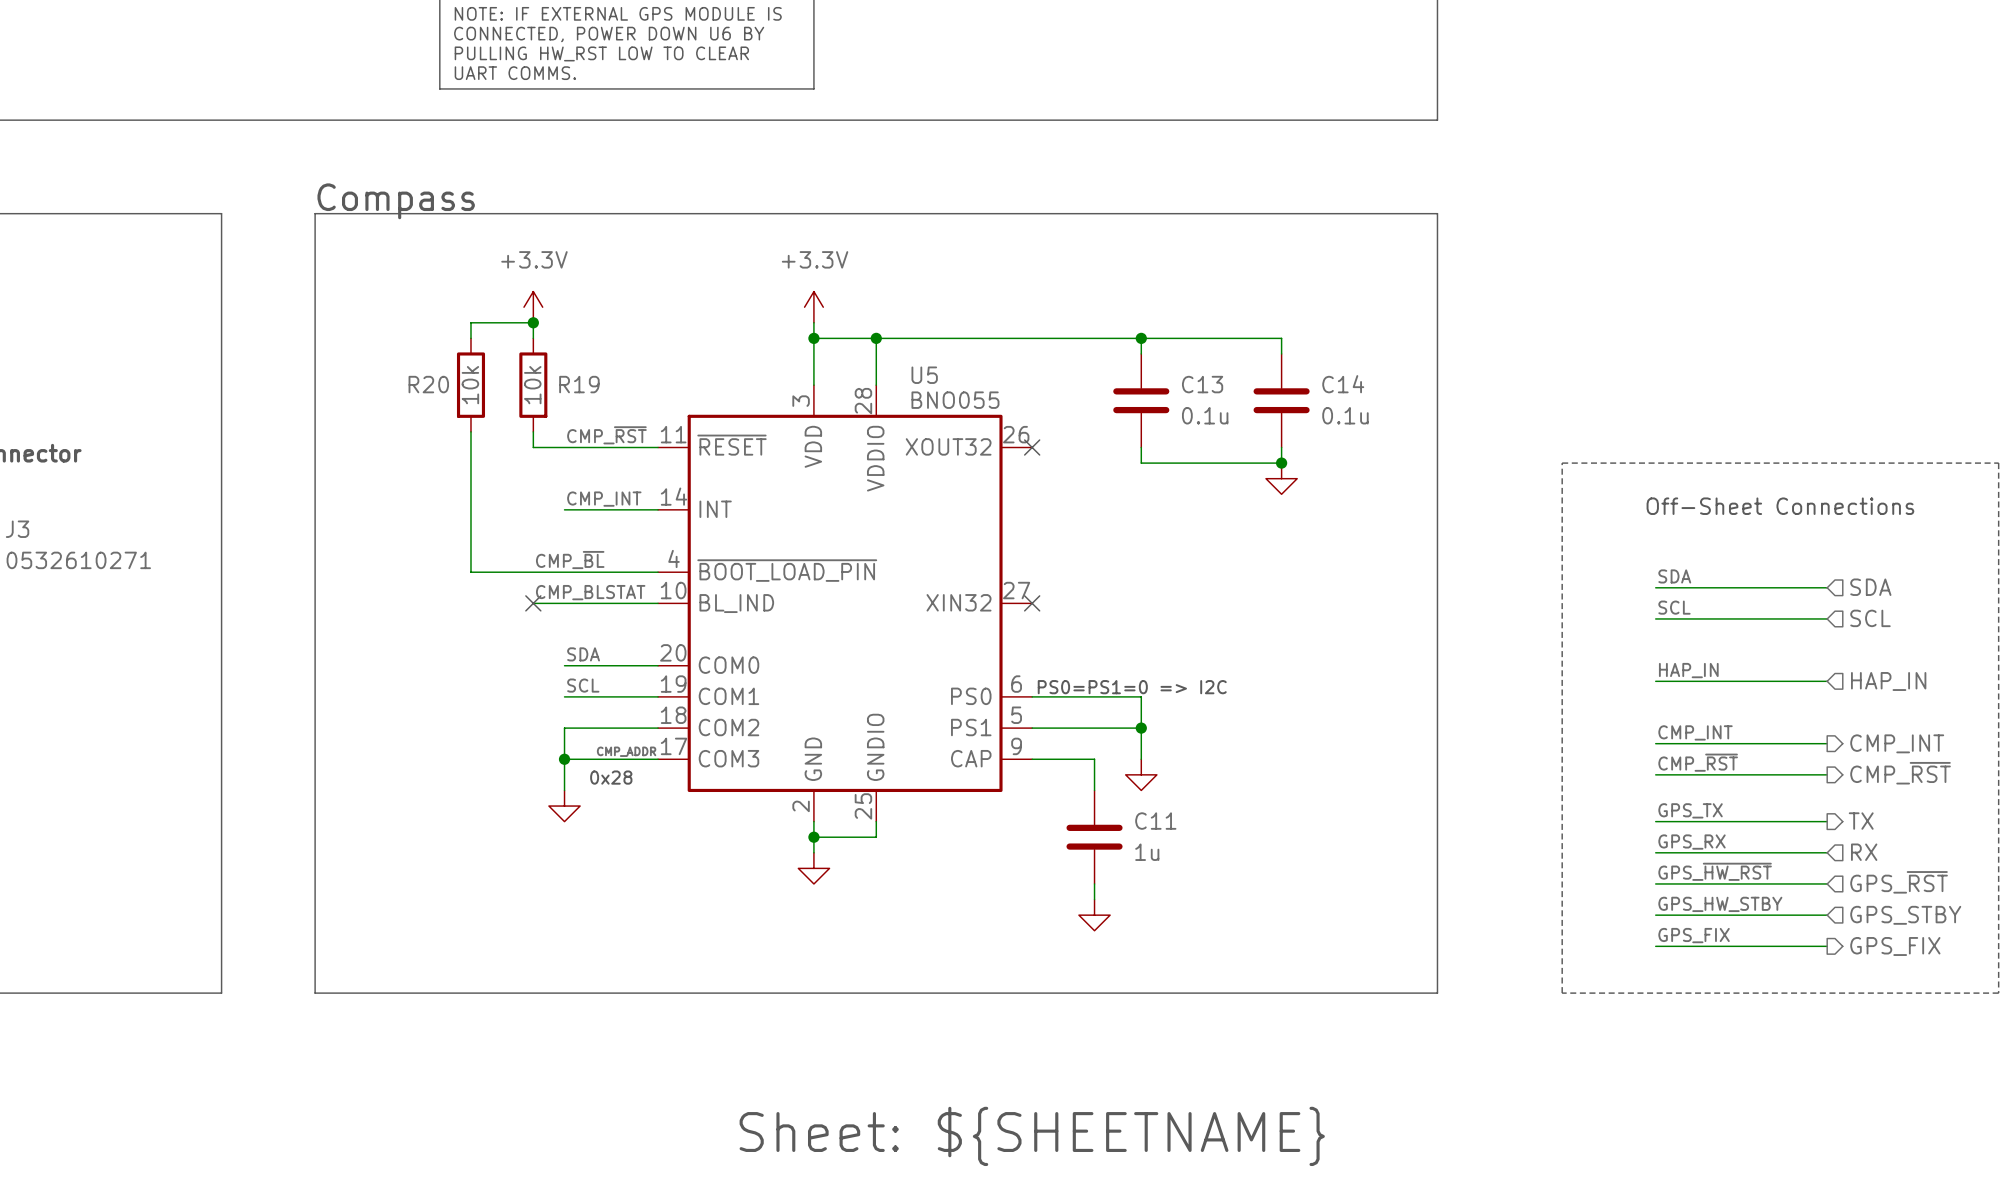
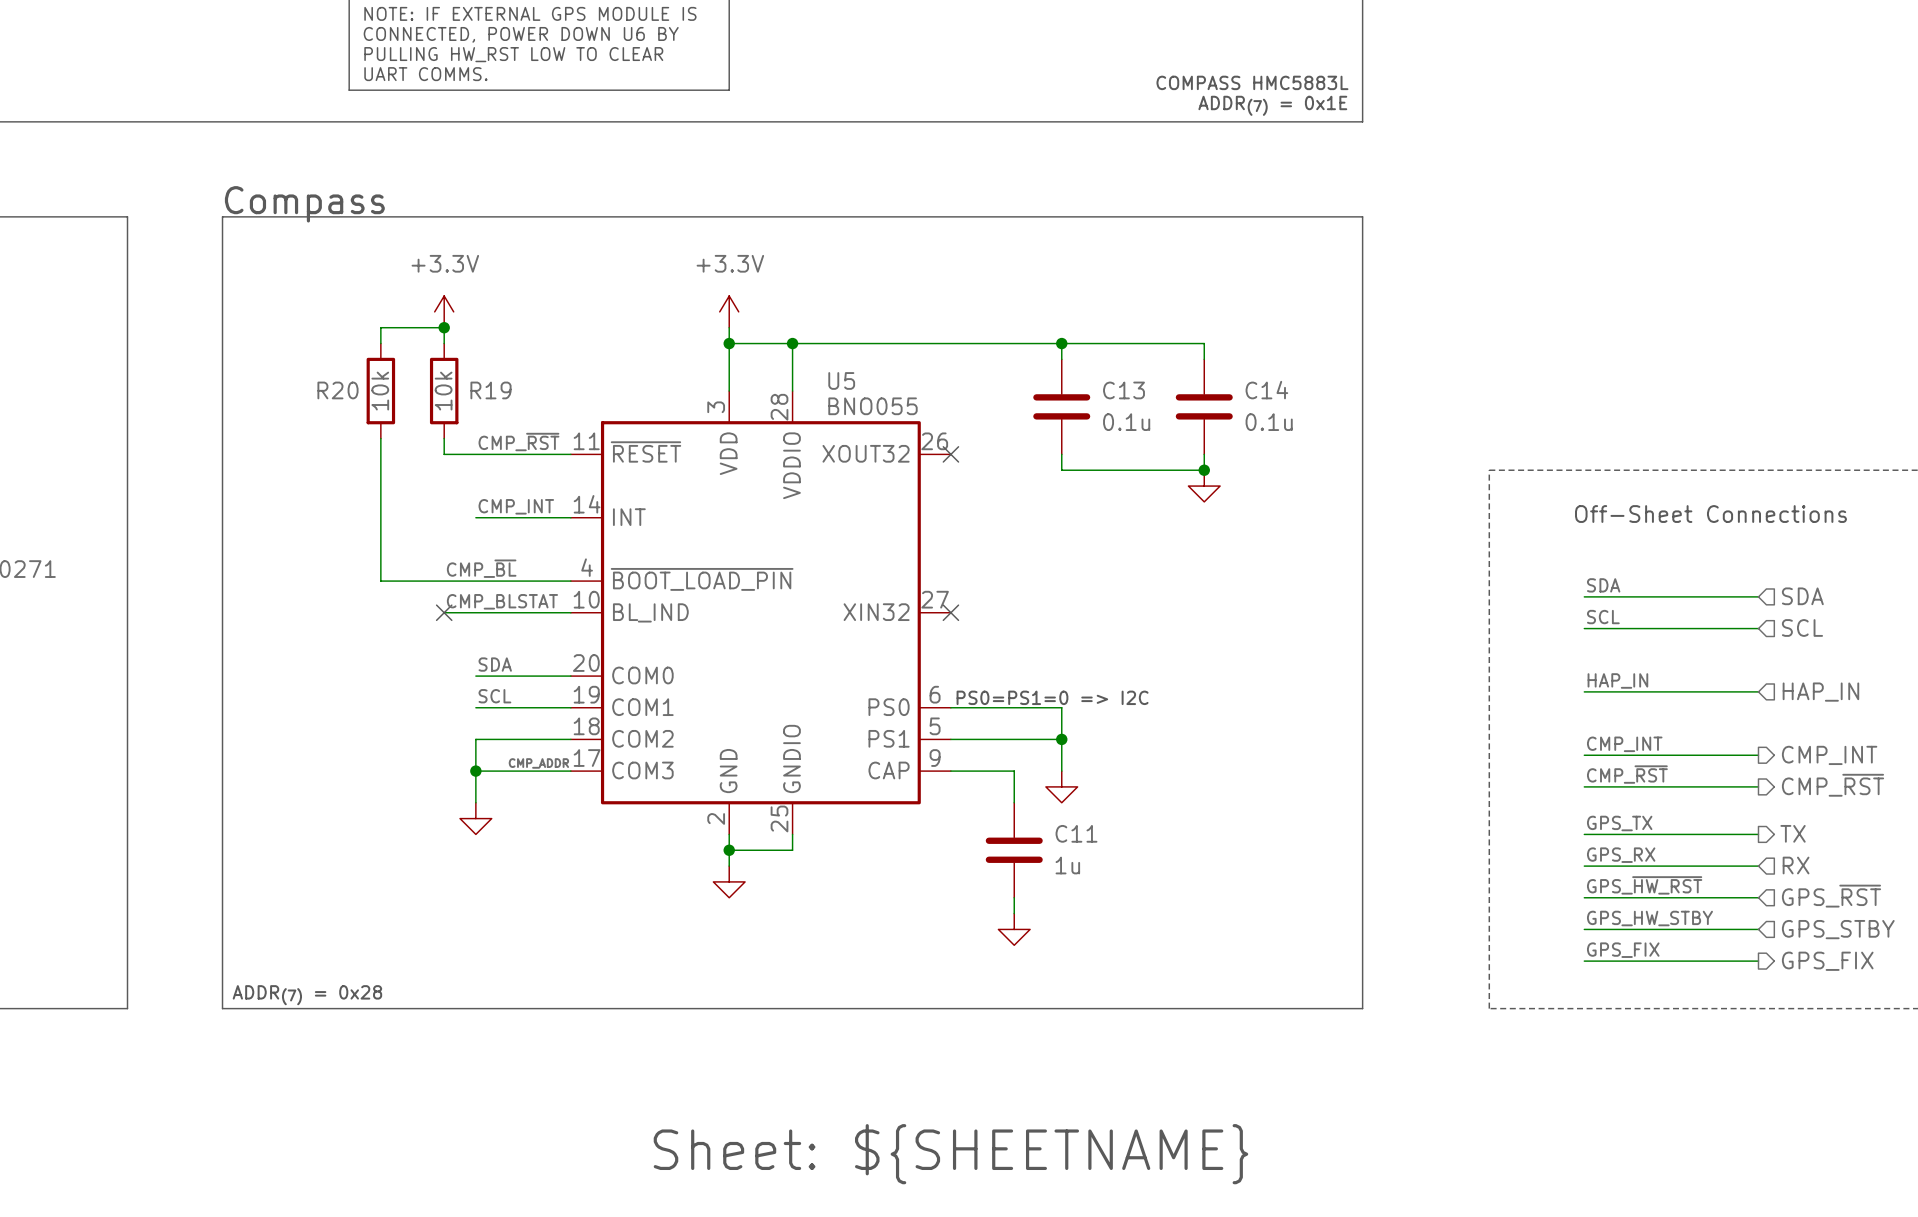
text: none -> COMPASS HMC5883L (1252, 82)
text: none -> ADDR(7) = 0x1E (1272, 105)
text: 0x28 (611, 777) -> none
text: none -> ADDR(7) = 0x28 (307, 995)

